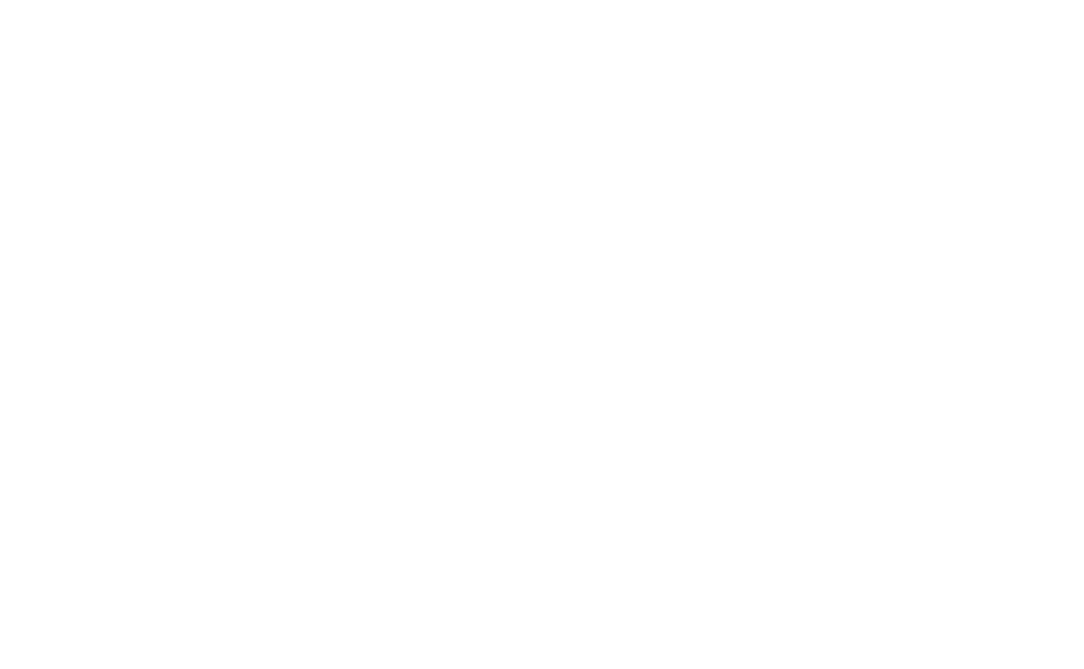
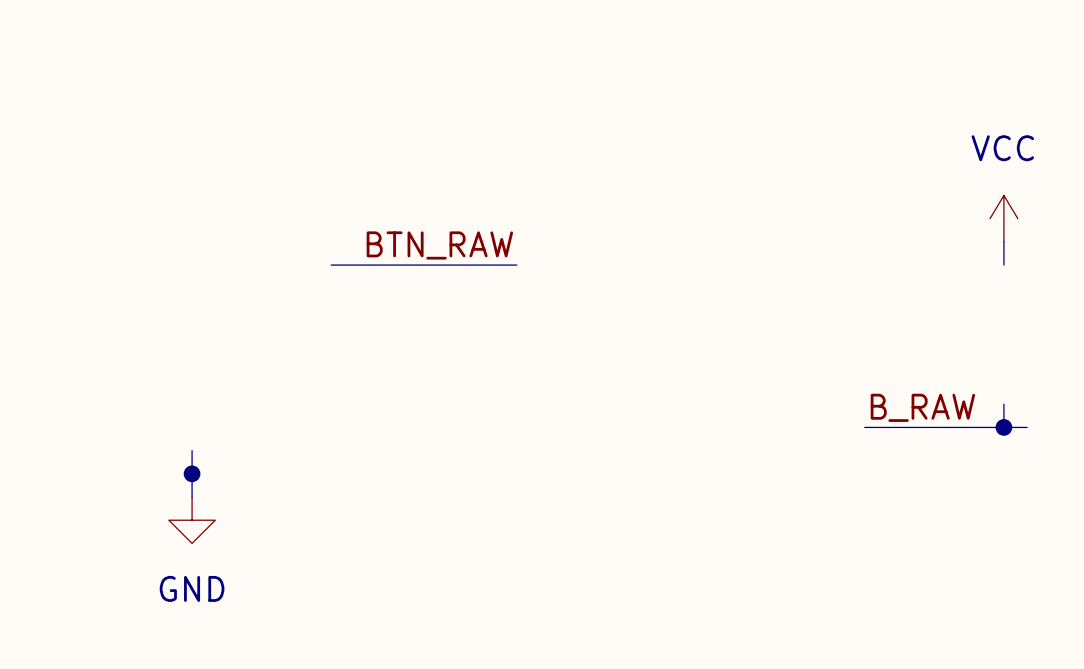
power symbol: none -> VCC (1003, 218)
wire: none -> (1003, 241) (1003, 265)
label: none -> BTN_RAW (439, 245)
wire: none -> (331, 265) (516, 265)
wire: none -> (1003, 404) (1003, 427)
label: none -> B_RAW (922, 407)
wire: none -> (864, 427) (1027, 427)
junction: none -> (1003, 427)
wire: none -> (192, 450) (192, 497)
junction: none -> (192, 473)
power symbol: none -> GND (192, 520)

